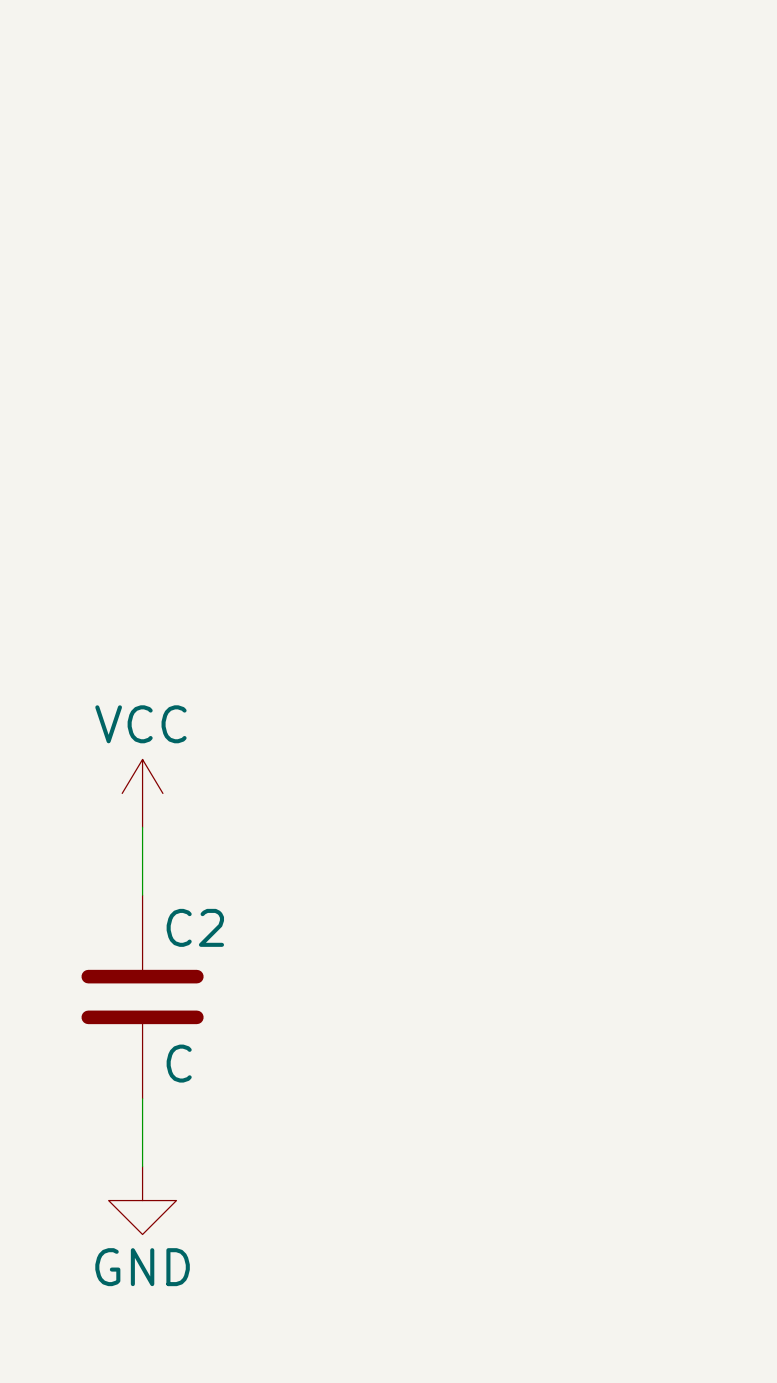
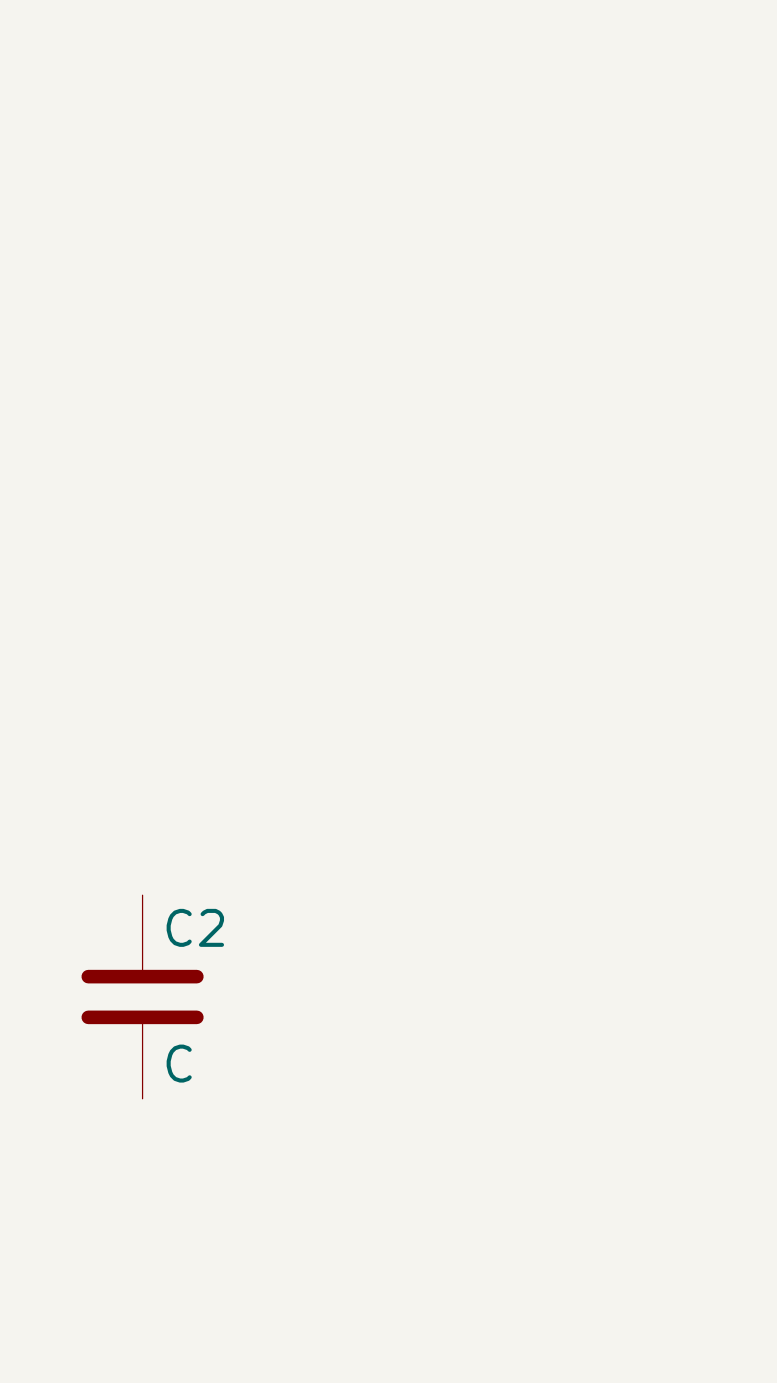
power symbol: VCC (142, 793) -> none
wire: (142, 827) (142, 895) -> none
wire: (142, 1098) (142, 1166) -> none
power symbol: GND (142, 1200) -> none

